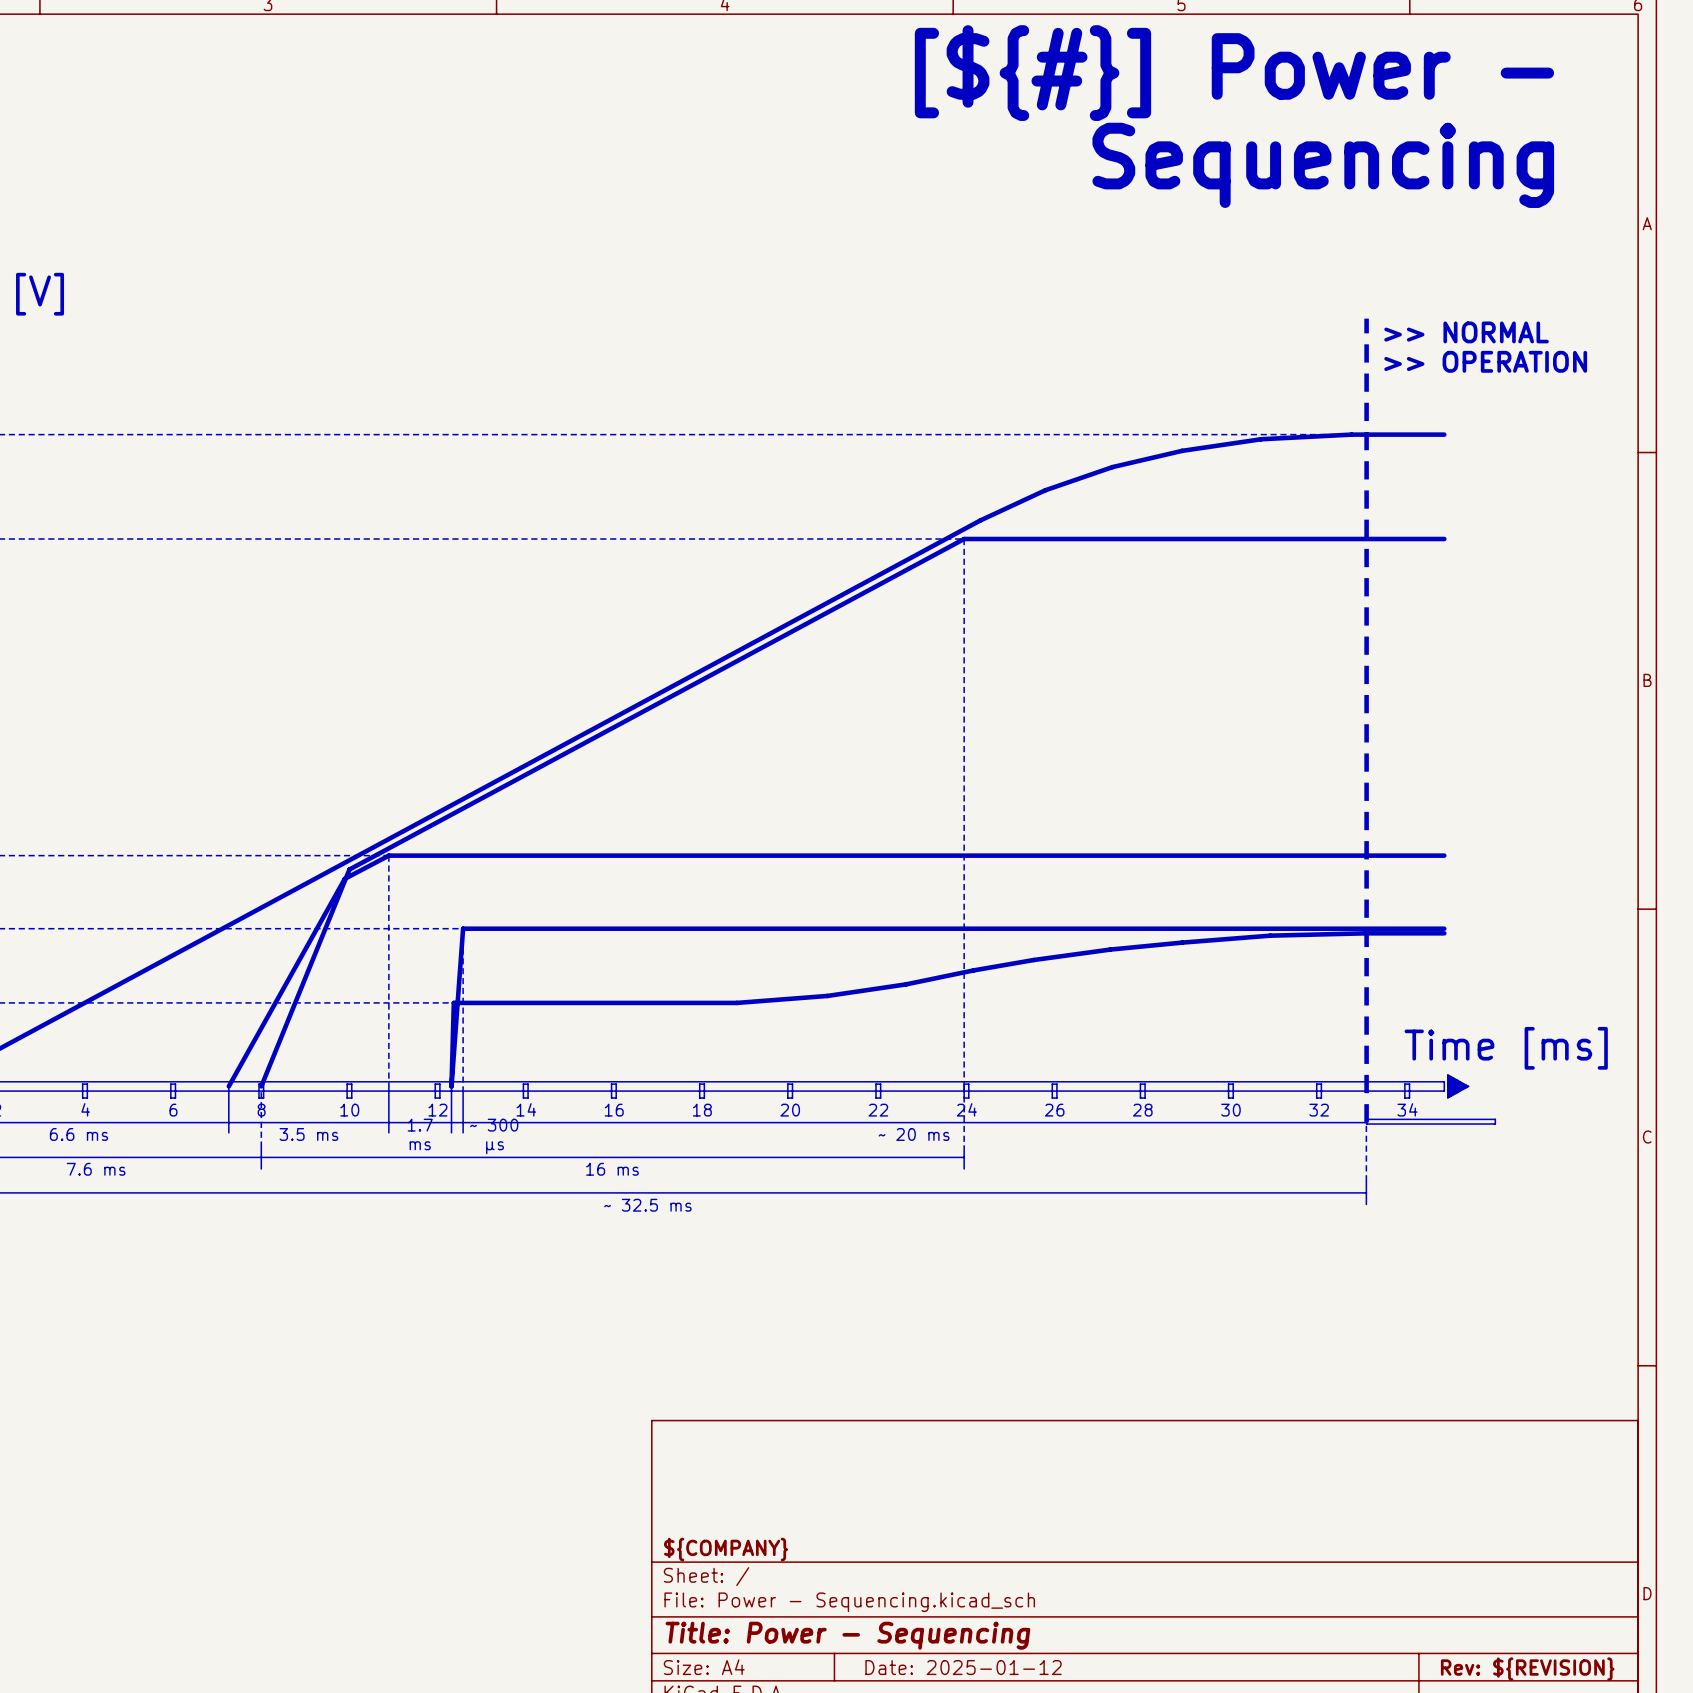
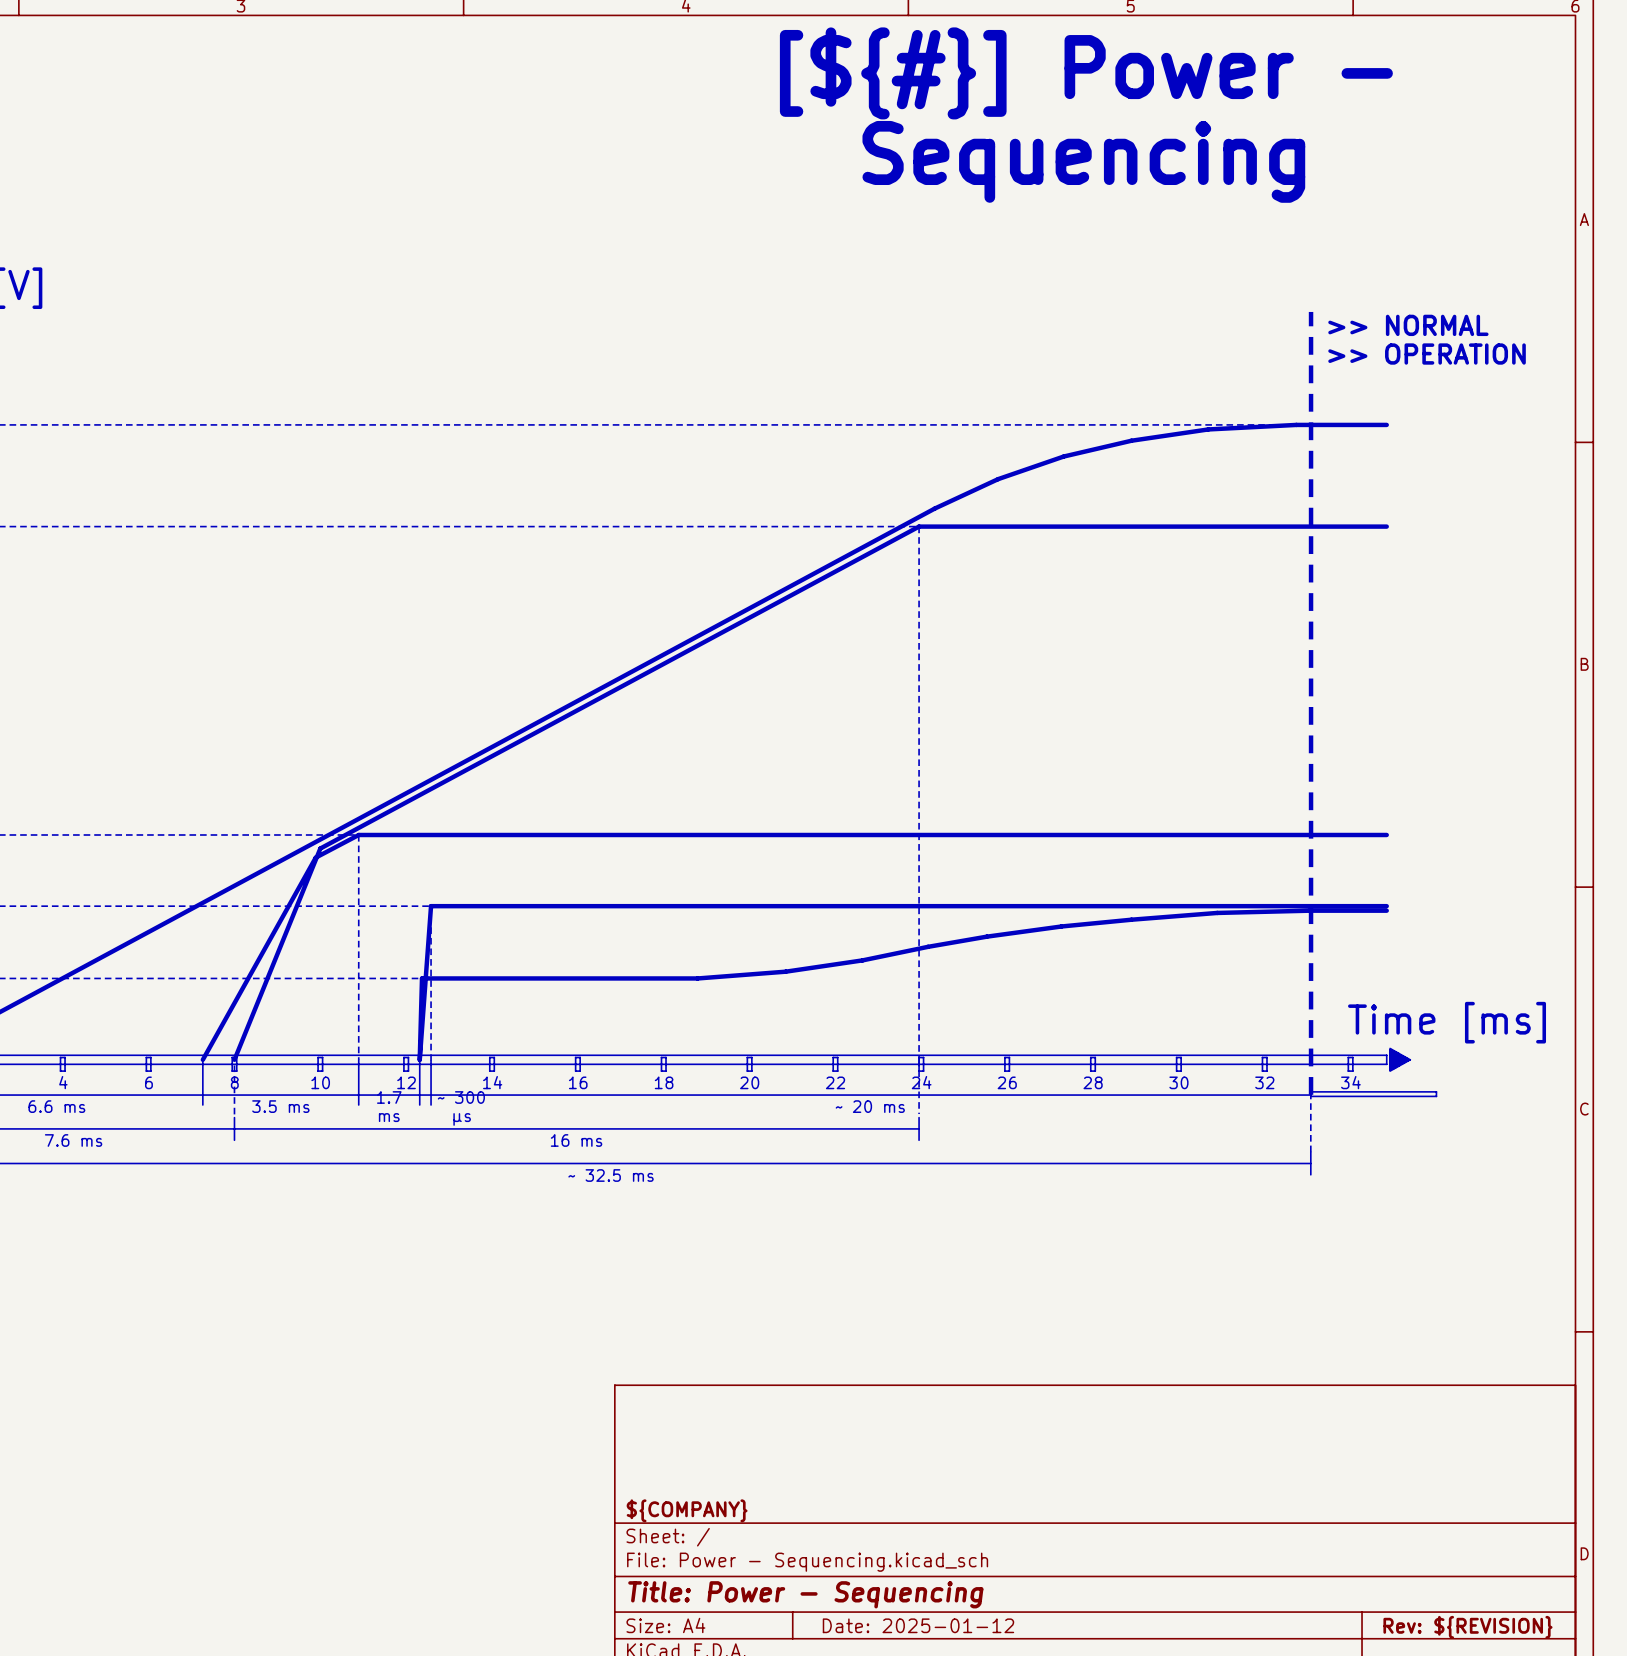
text: none -> [${#}] Power - (1086, 73)
text: [${#}] Power - (1234, 73) -> none
text: none -> Sequencing (1083, 161)
text: Sequencing (1323, 165) -> none

